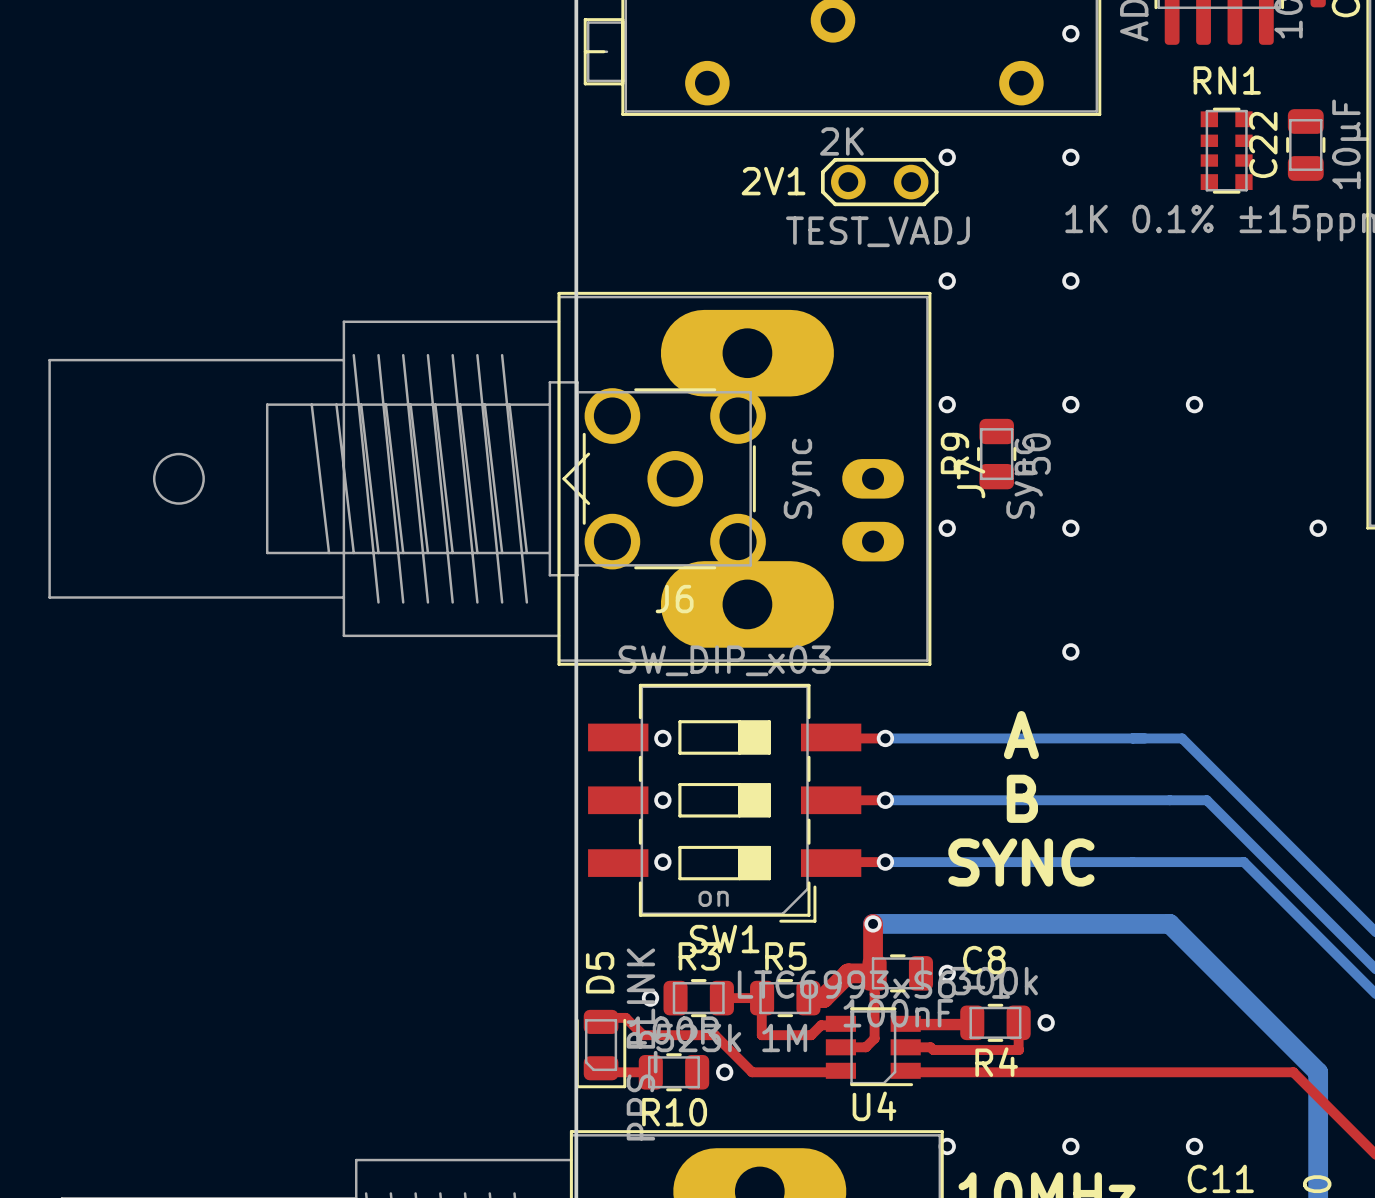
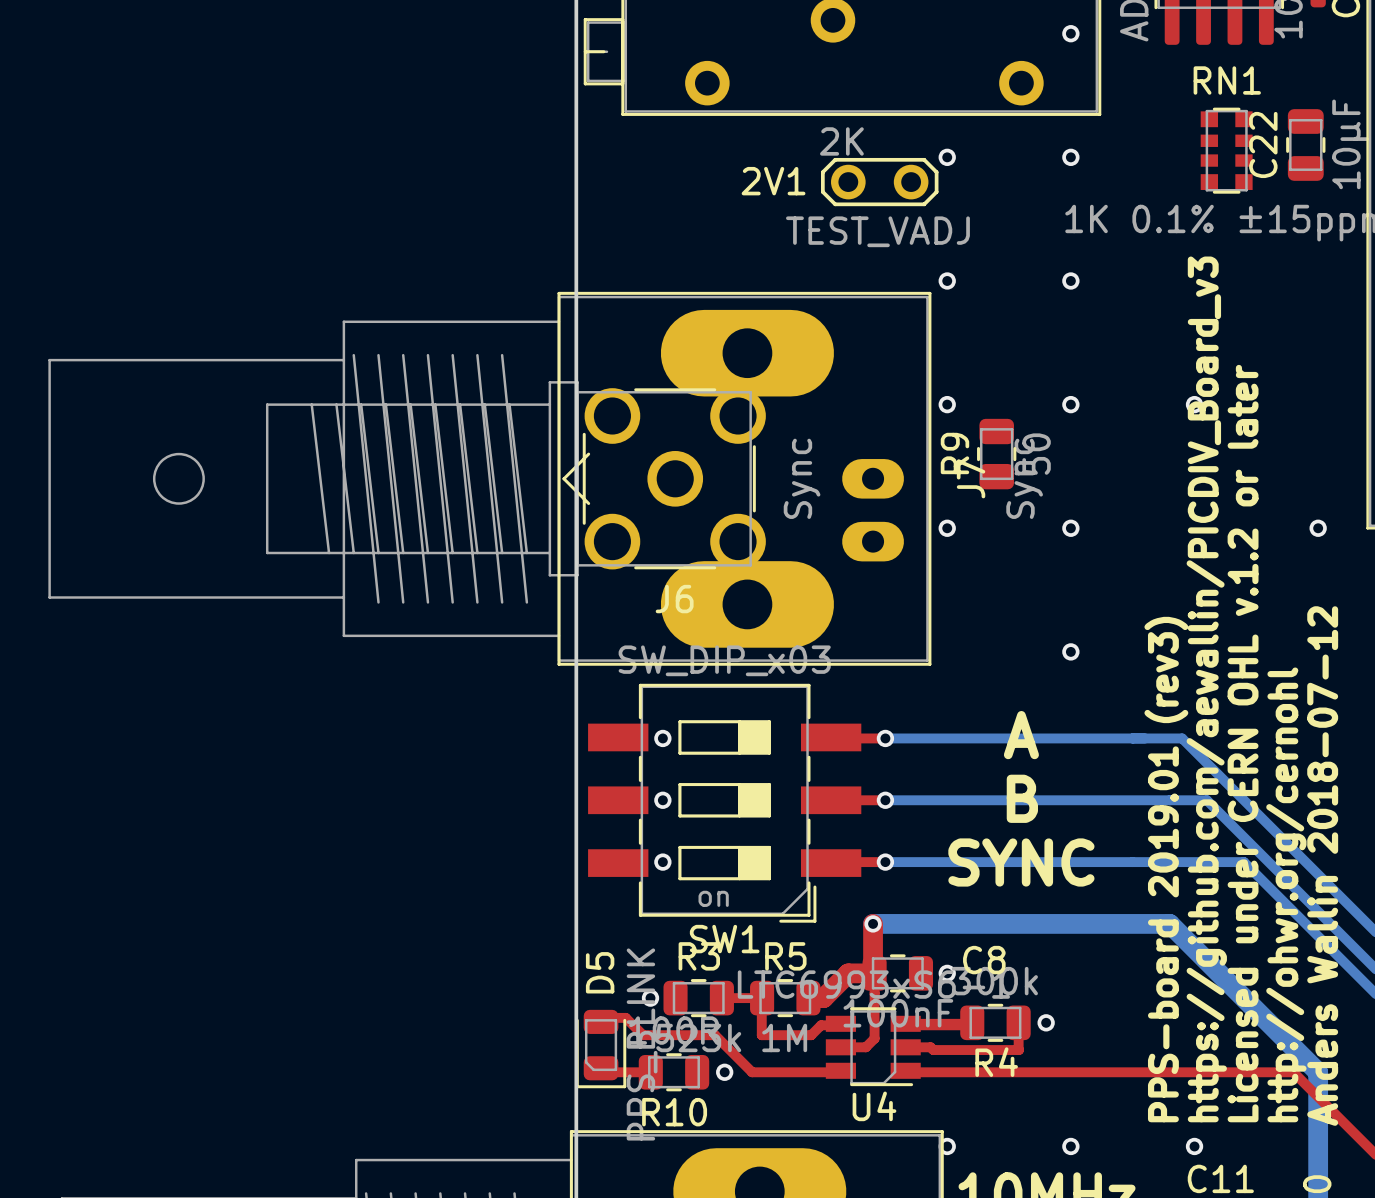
text: none -> https://github.com/aewallin/PICDIV_Board_v3 (1206, 689)
text: none -> Licensed under CERN OHL v.1.2 or later (1243, 743)
text: none -> Anders Wallin 2018-07-12 (1322, 866)
text: none -> PPS-board 2019.01 (rev3) (1166, 869)
text: none -> http://ohwr.org/cernohl (1286, 894)

